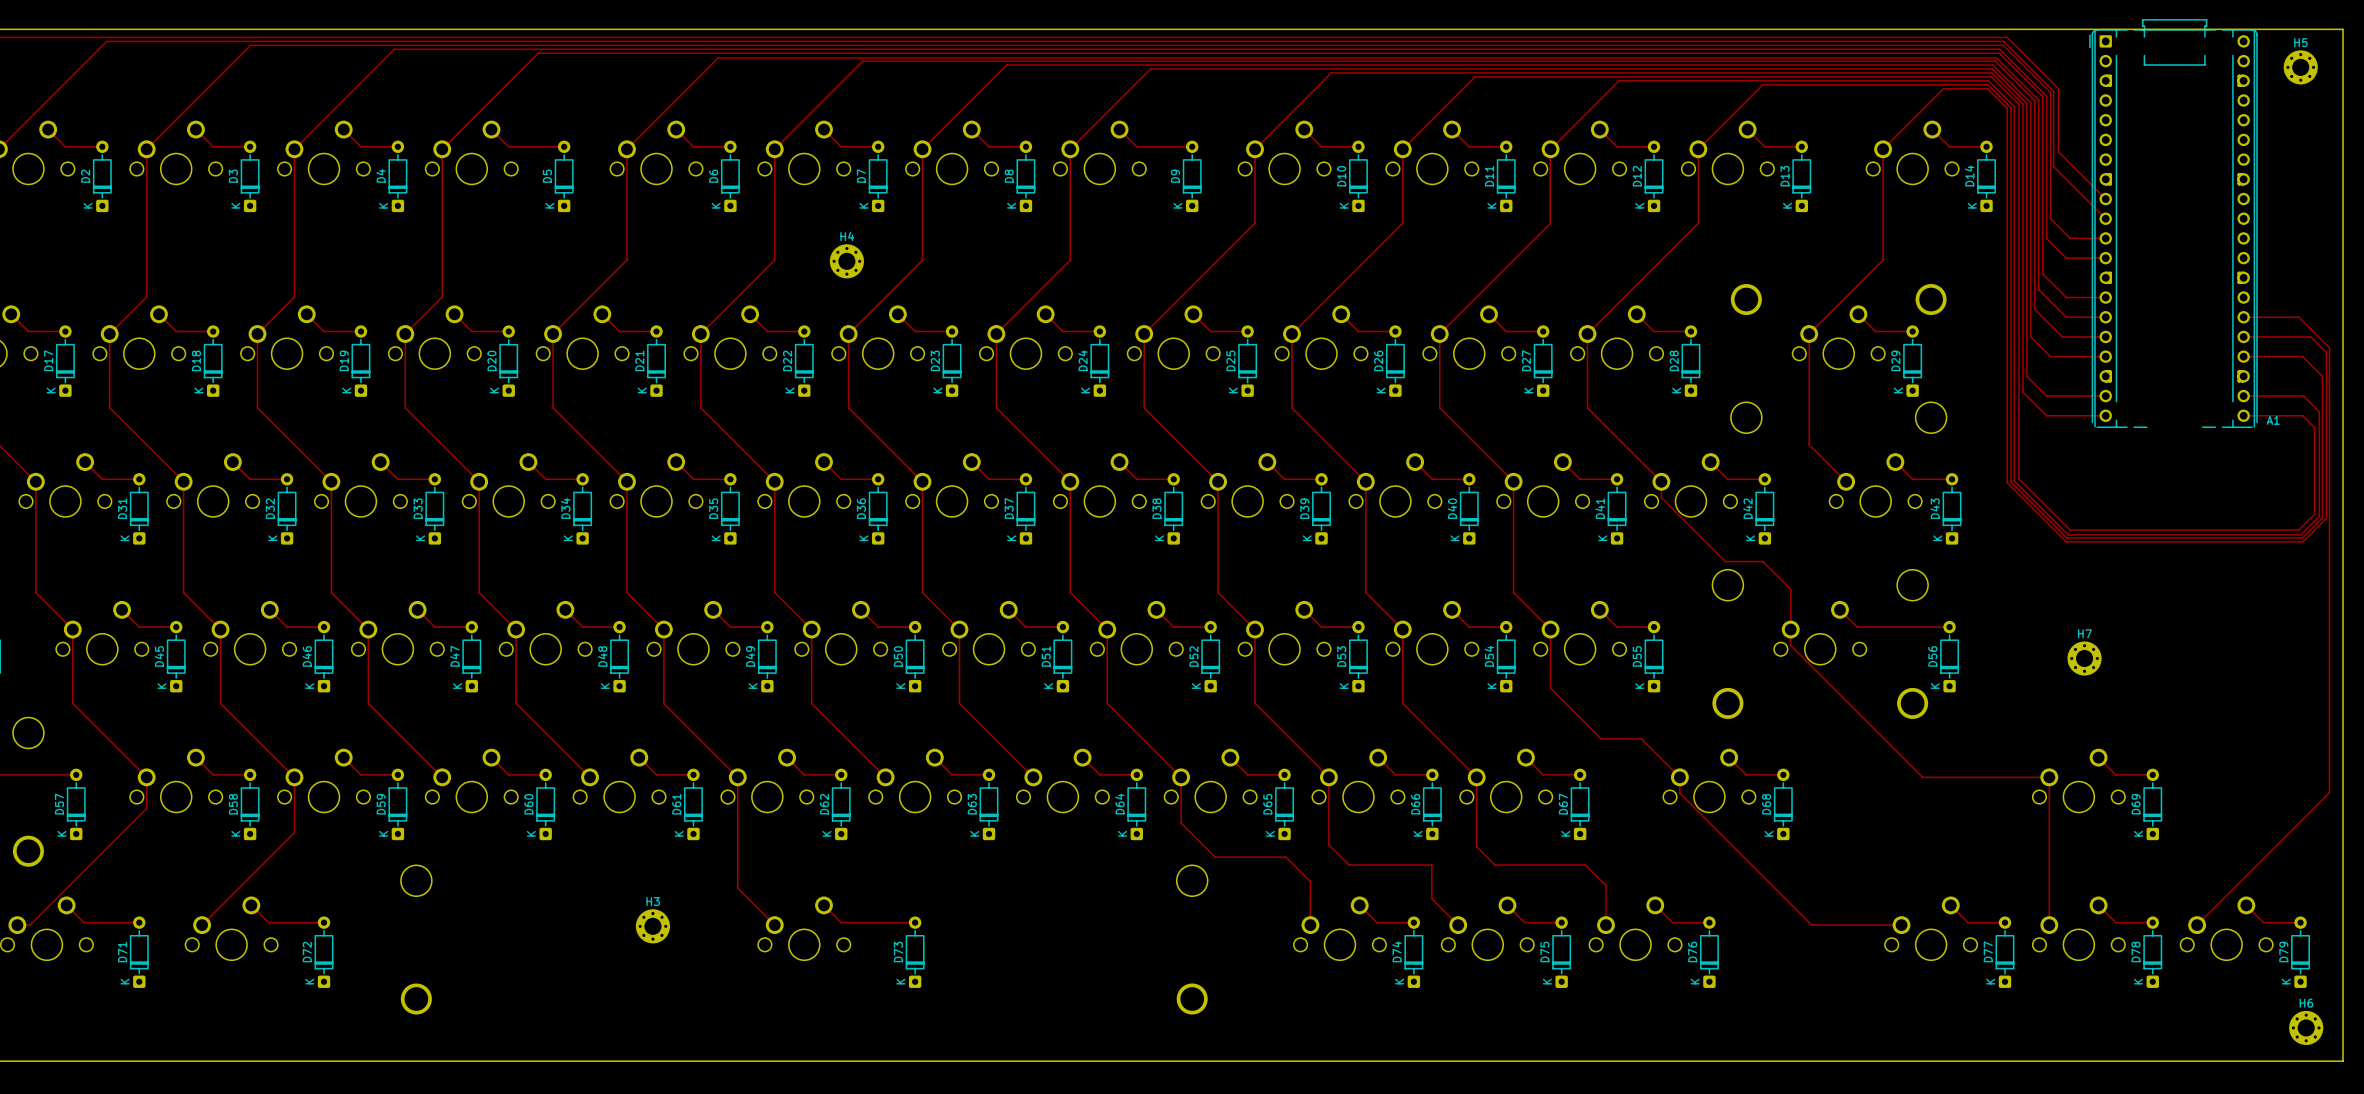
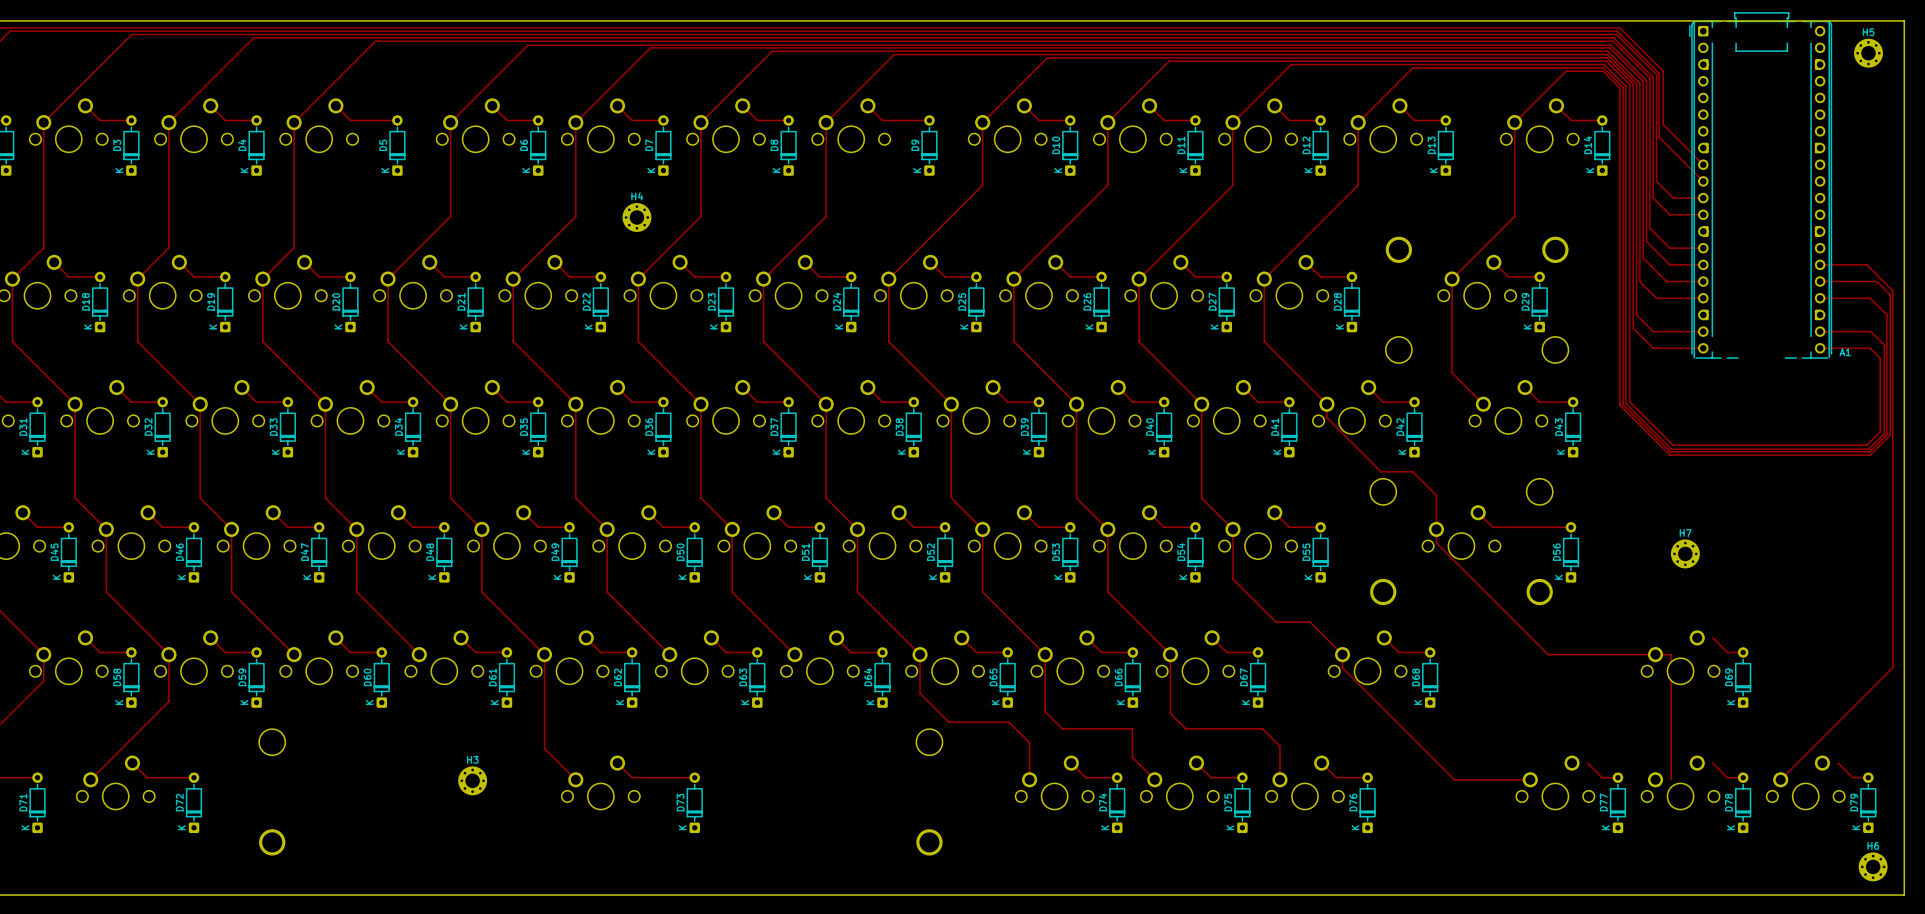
track: (2098, 757) (2115, 774) (2134, 774) -> (1712, 637) (1727, 652)
track: (2049, 777) (2049, 925) -> (1655, 654) (1671, 654) (1671, 779)
track: (1950, 905) (1968, 922) (1986, 922) -> (1587, 763) (1602, 777)
track: (2098, 905) (2115, 922) (2134, 922) -> (1712, 763) (1727, 777)
track: (2246, 905) (2263, 922) (2282, 922) -> (1838, 763) (1852, 777)

